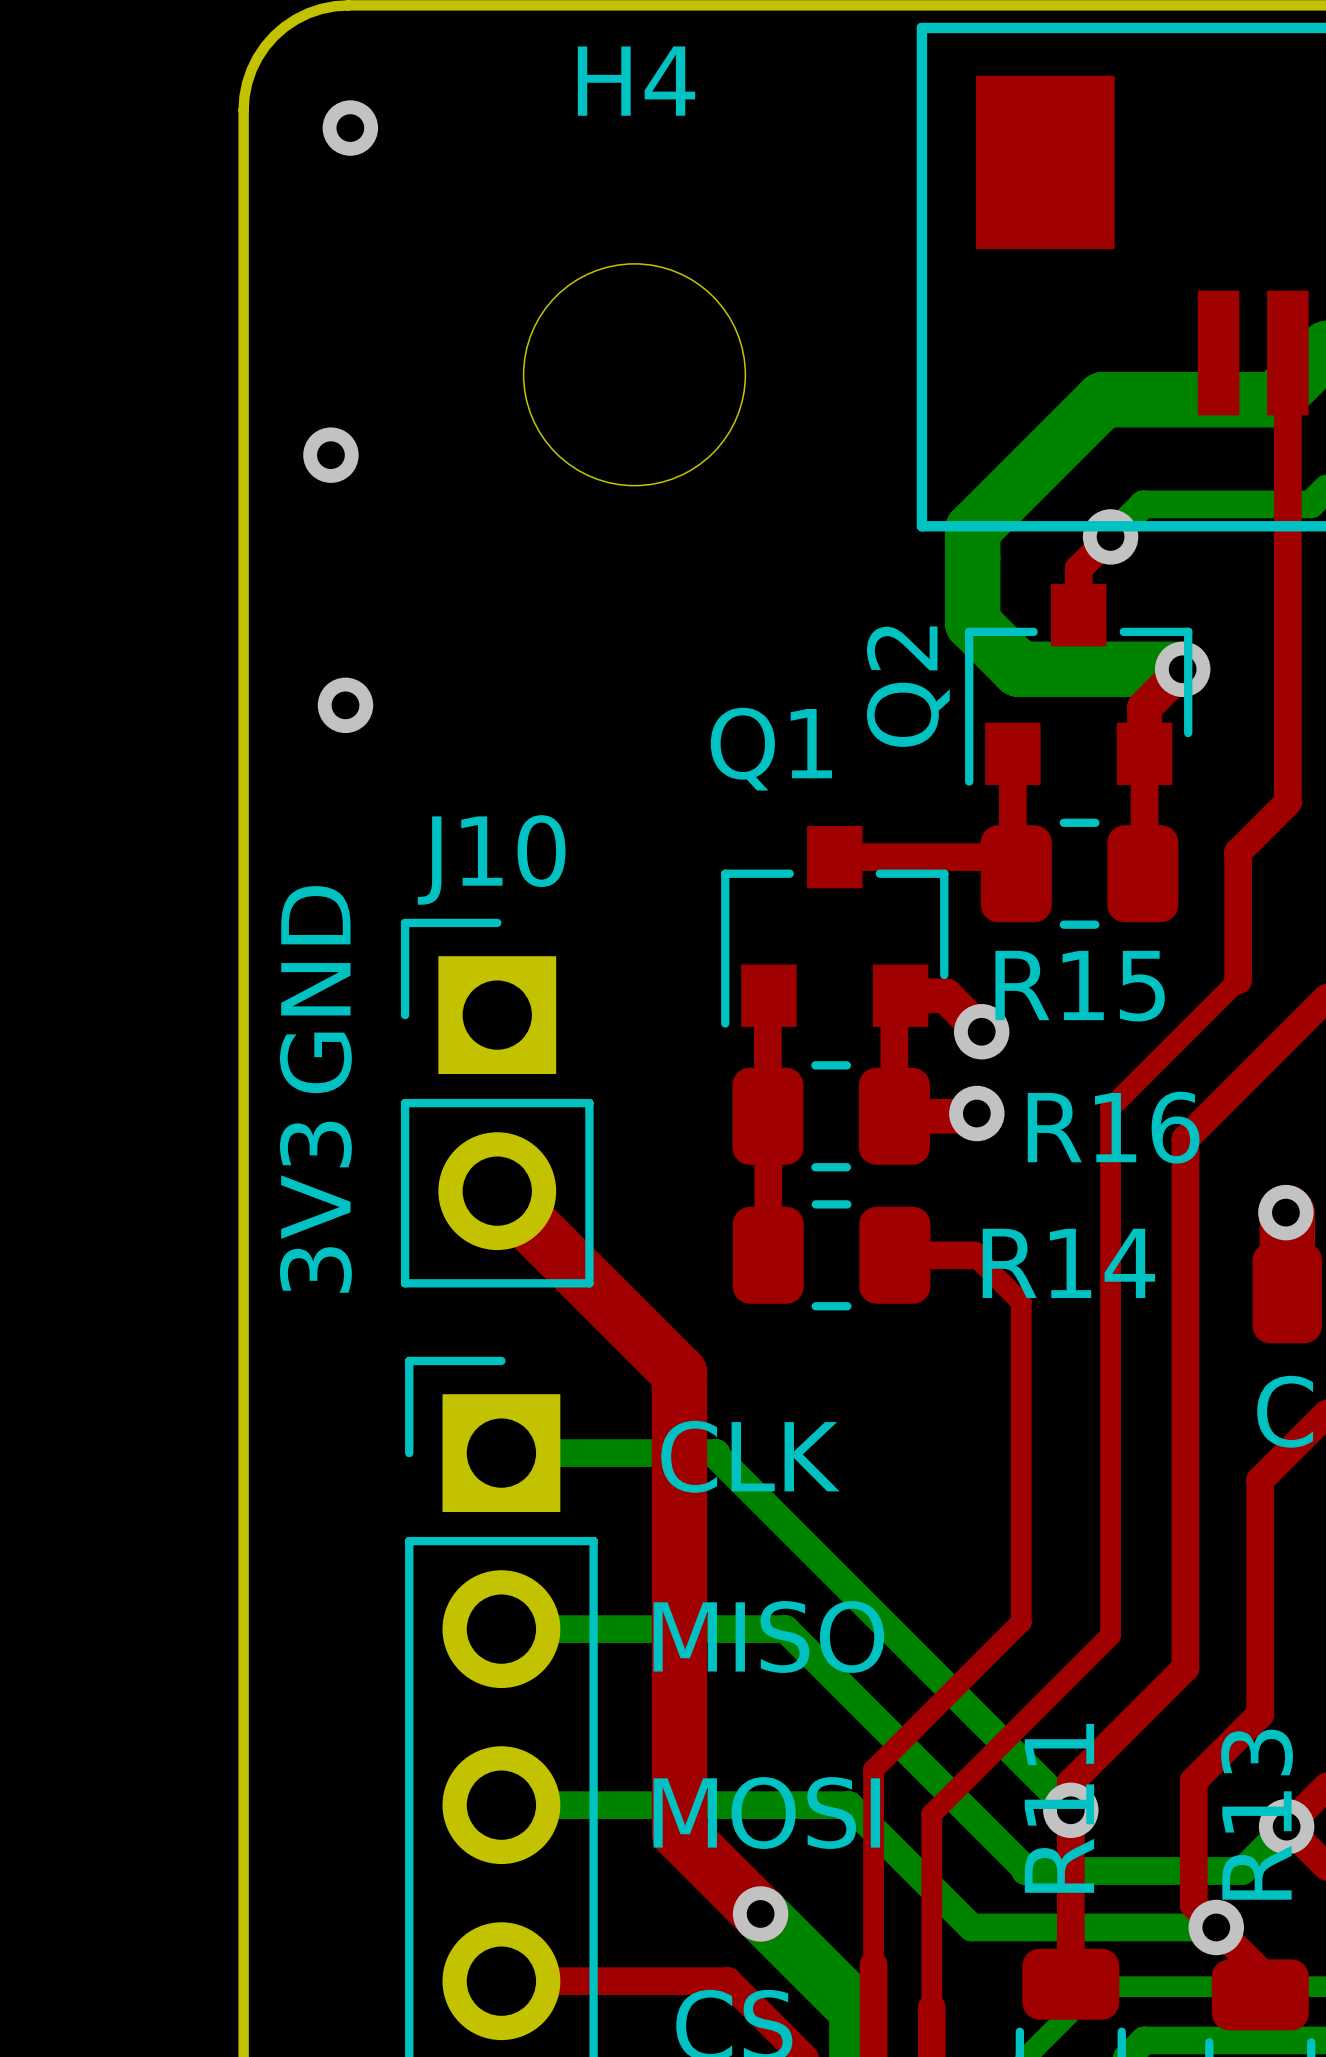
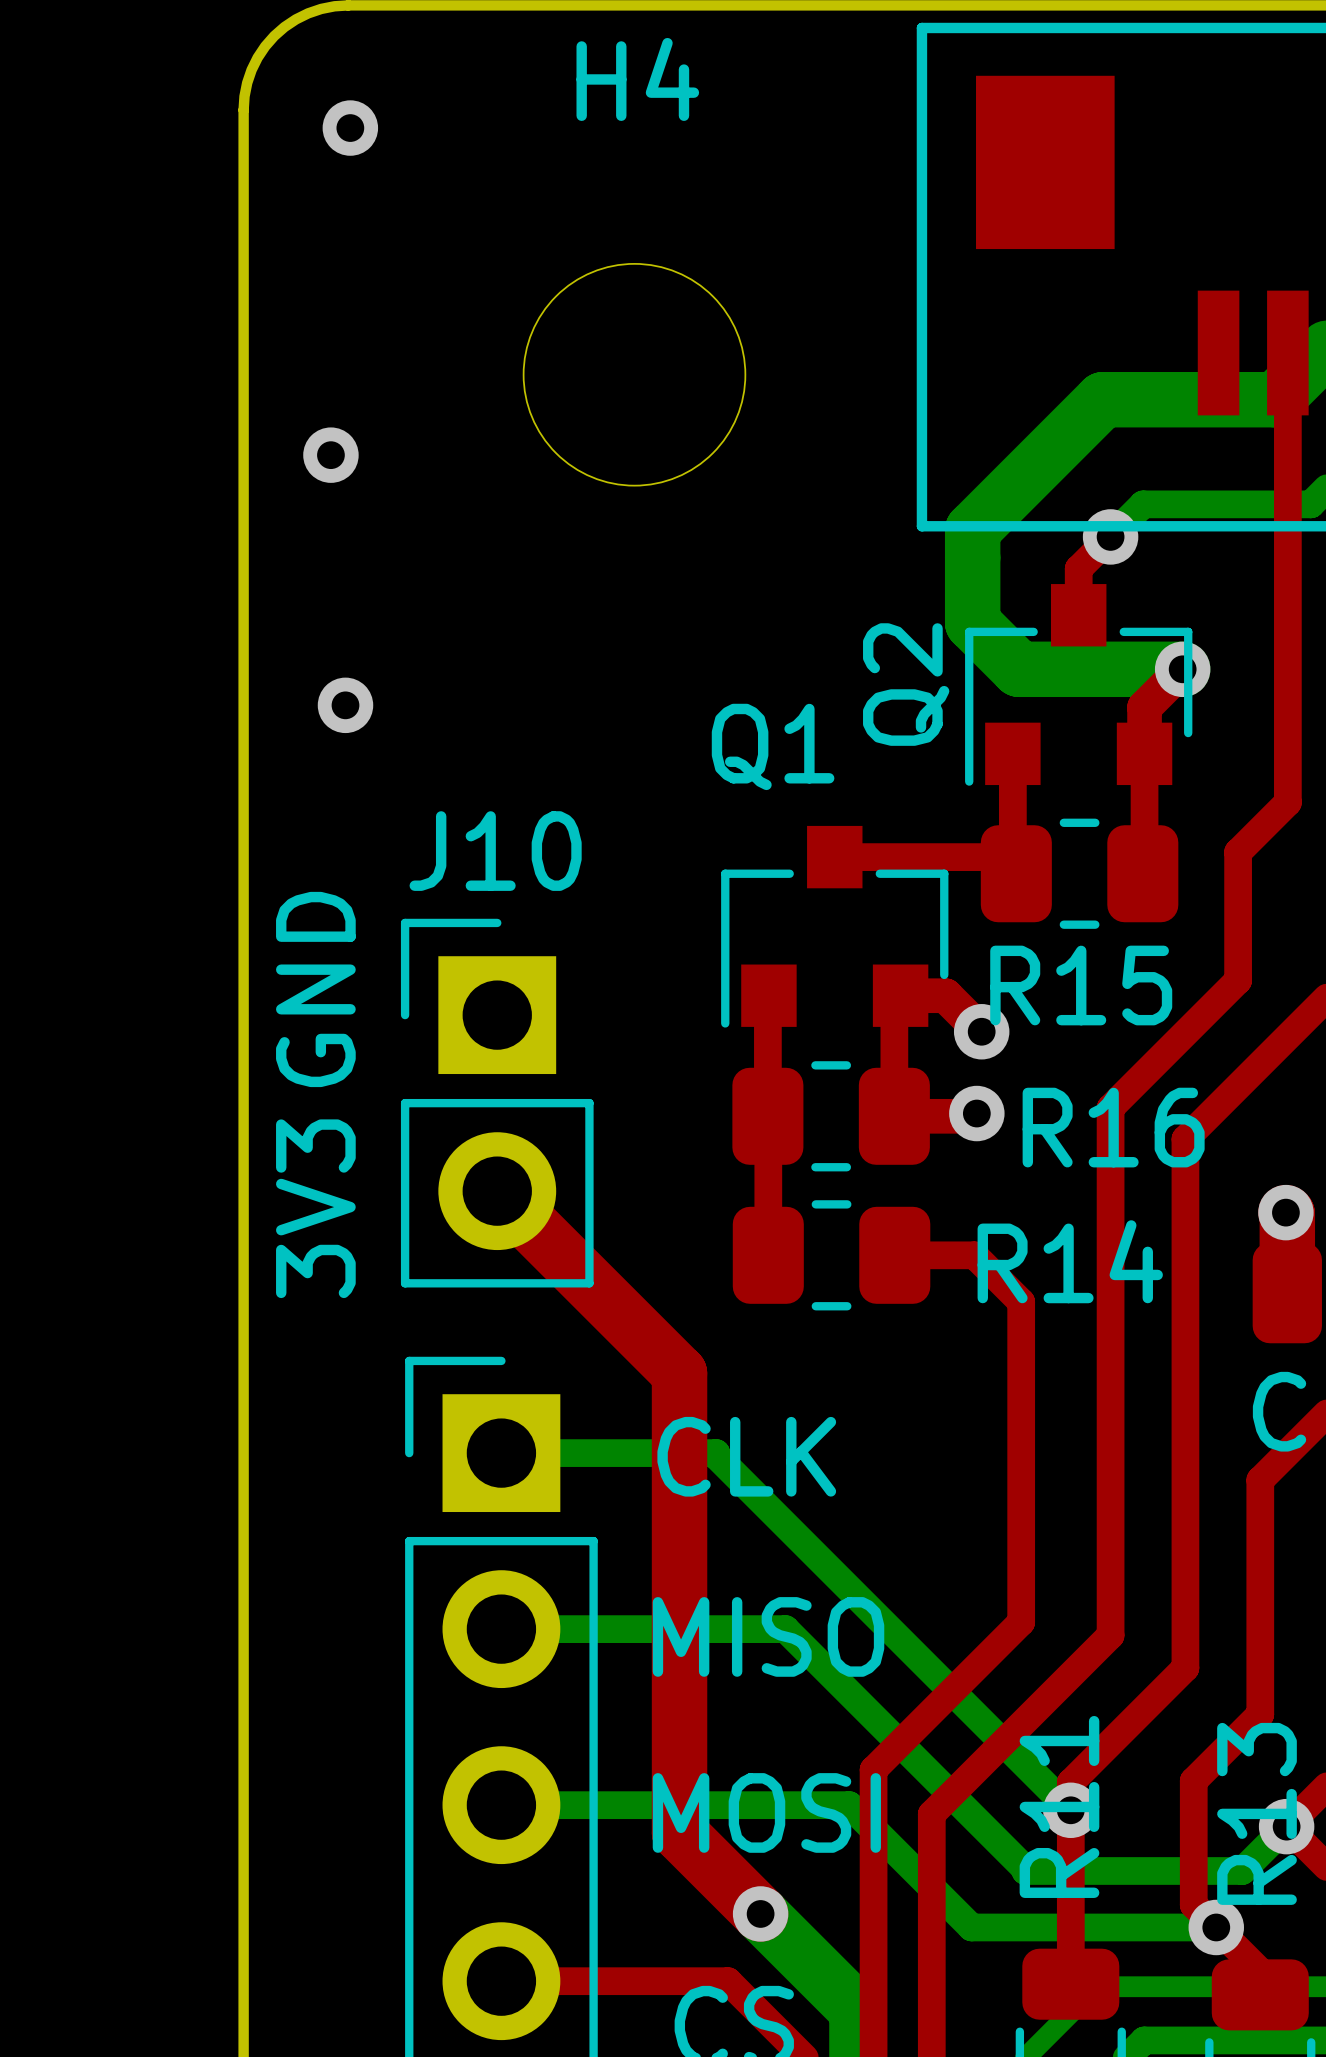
top track width: thin (1238, 980) (1110, 1107) (1110, 1635) (931, 1814) (931, 2007) -> thick (1238, 980) (1110, 1107) (1110, 1635) (931, 1814) (931, 2007)
top track width: thin (974, 1255) (1021, 1302) (1021, 1622) (873, 1769) (873, 1964) -> thick (974, 1255) (1021, 1302) (1021, 1622) (873, 1769) (873, 1964)

